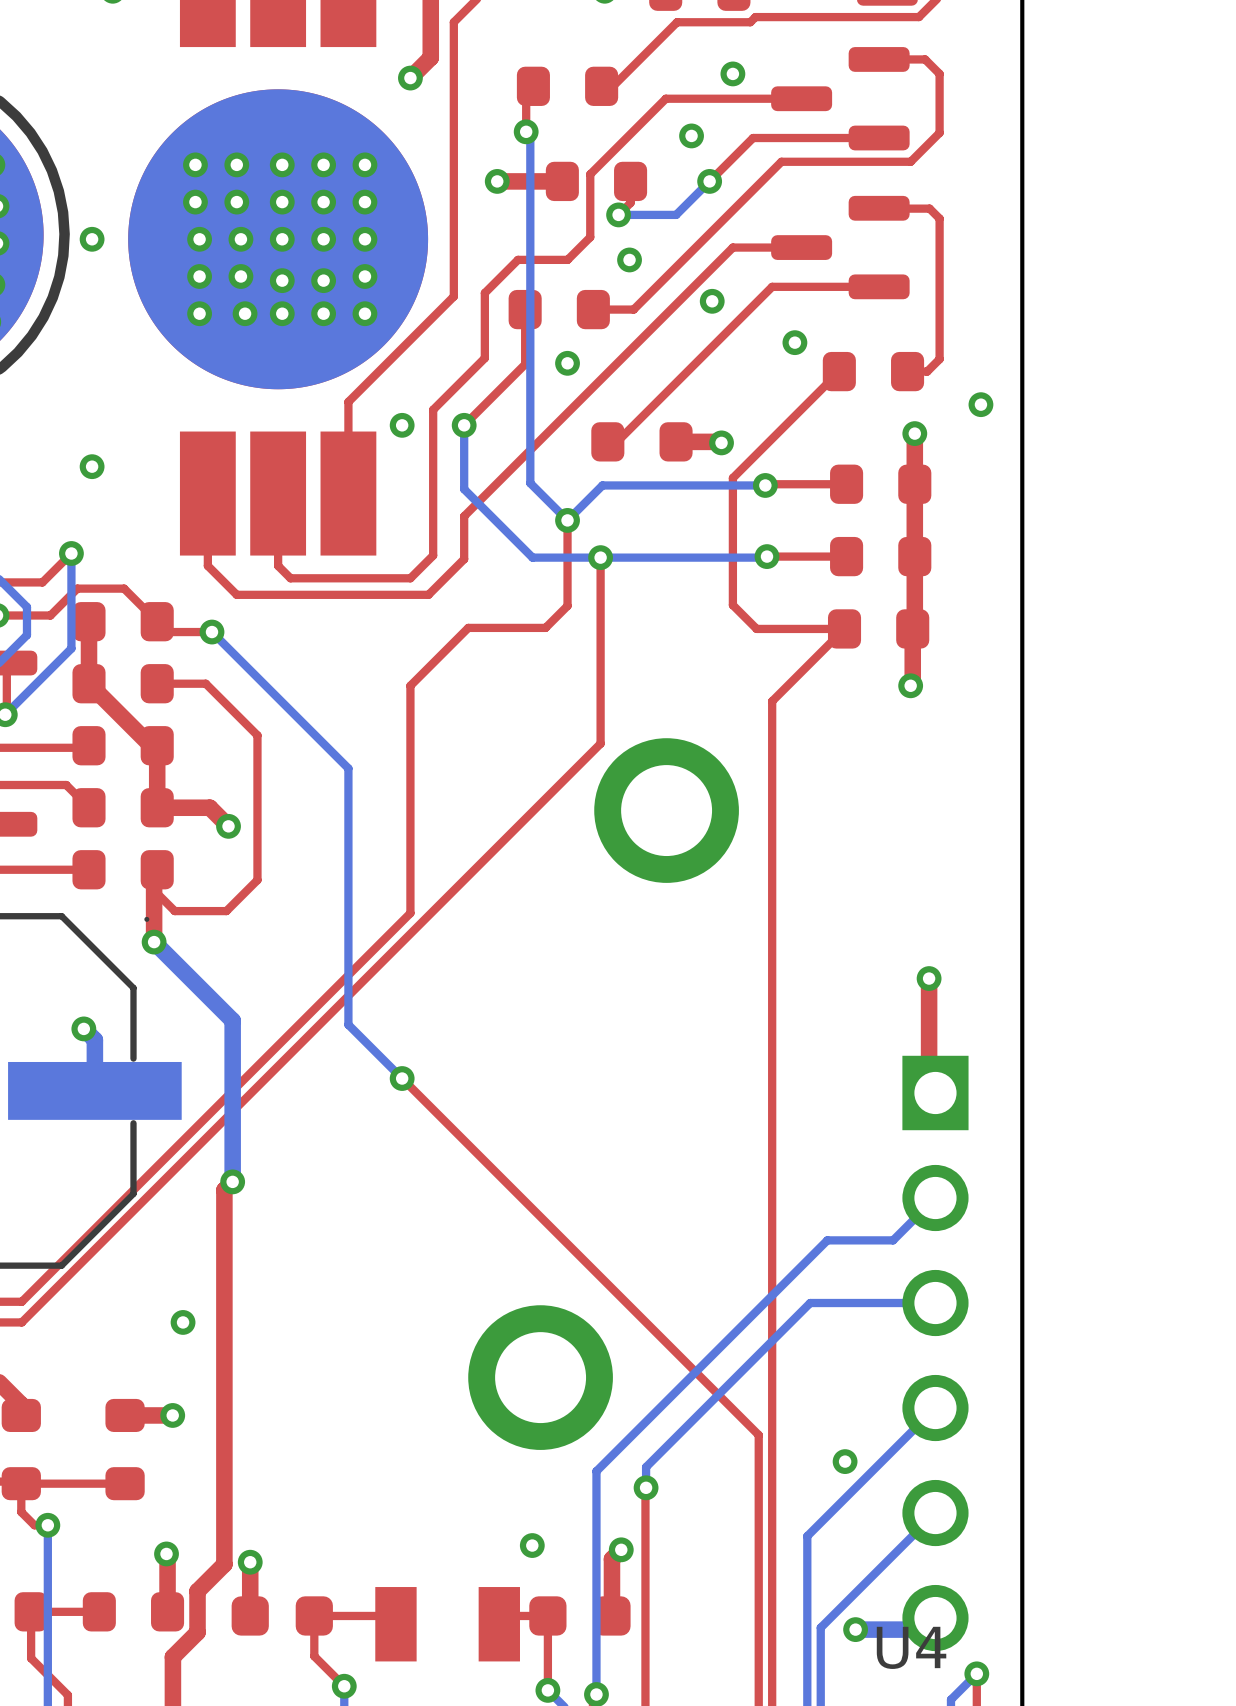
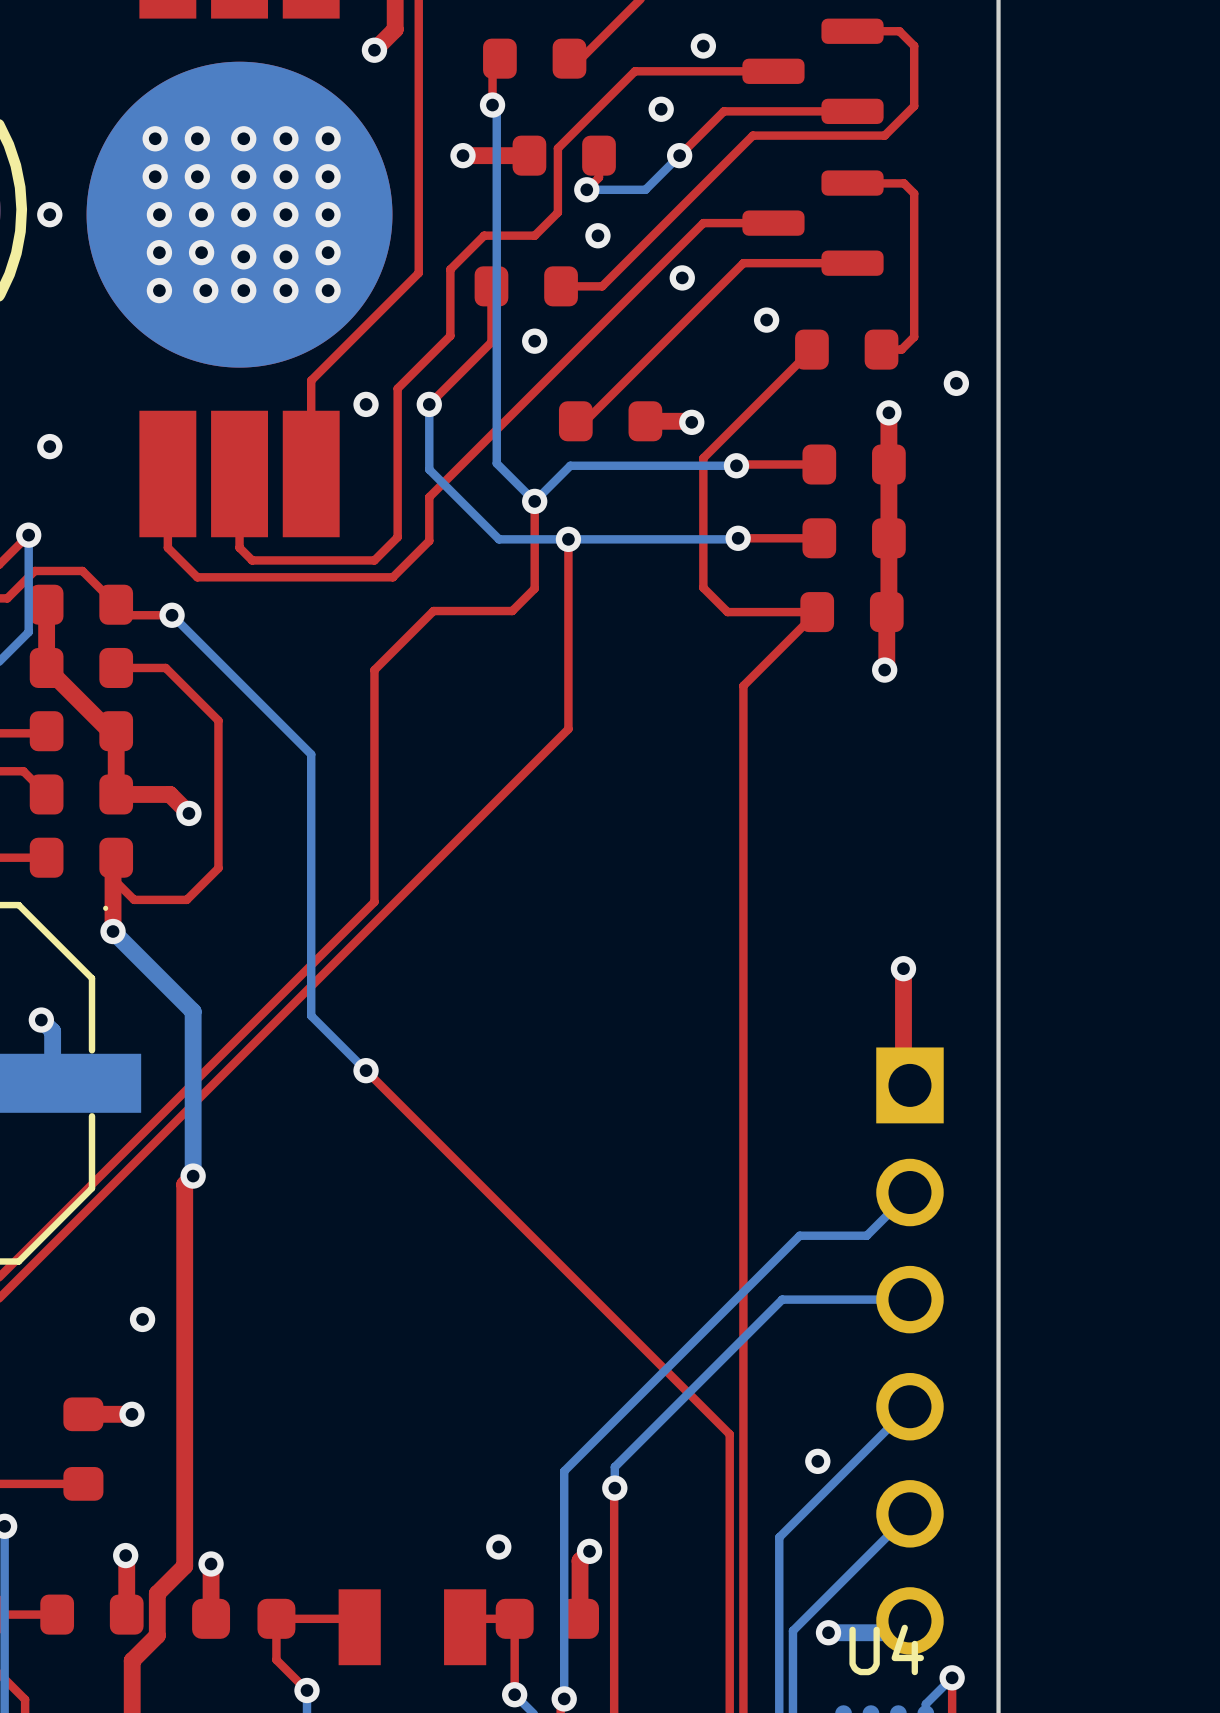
part: (666, 810) -> none
part: (540, 1377) -> none

